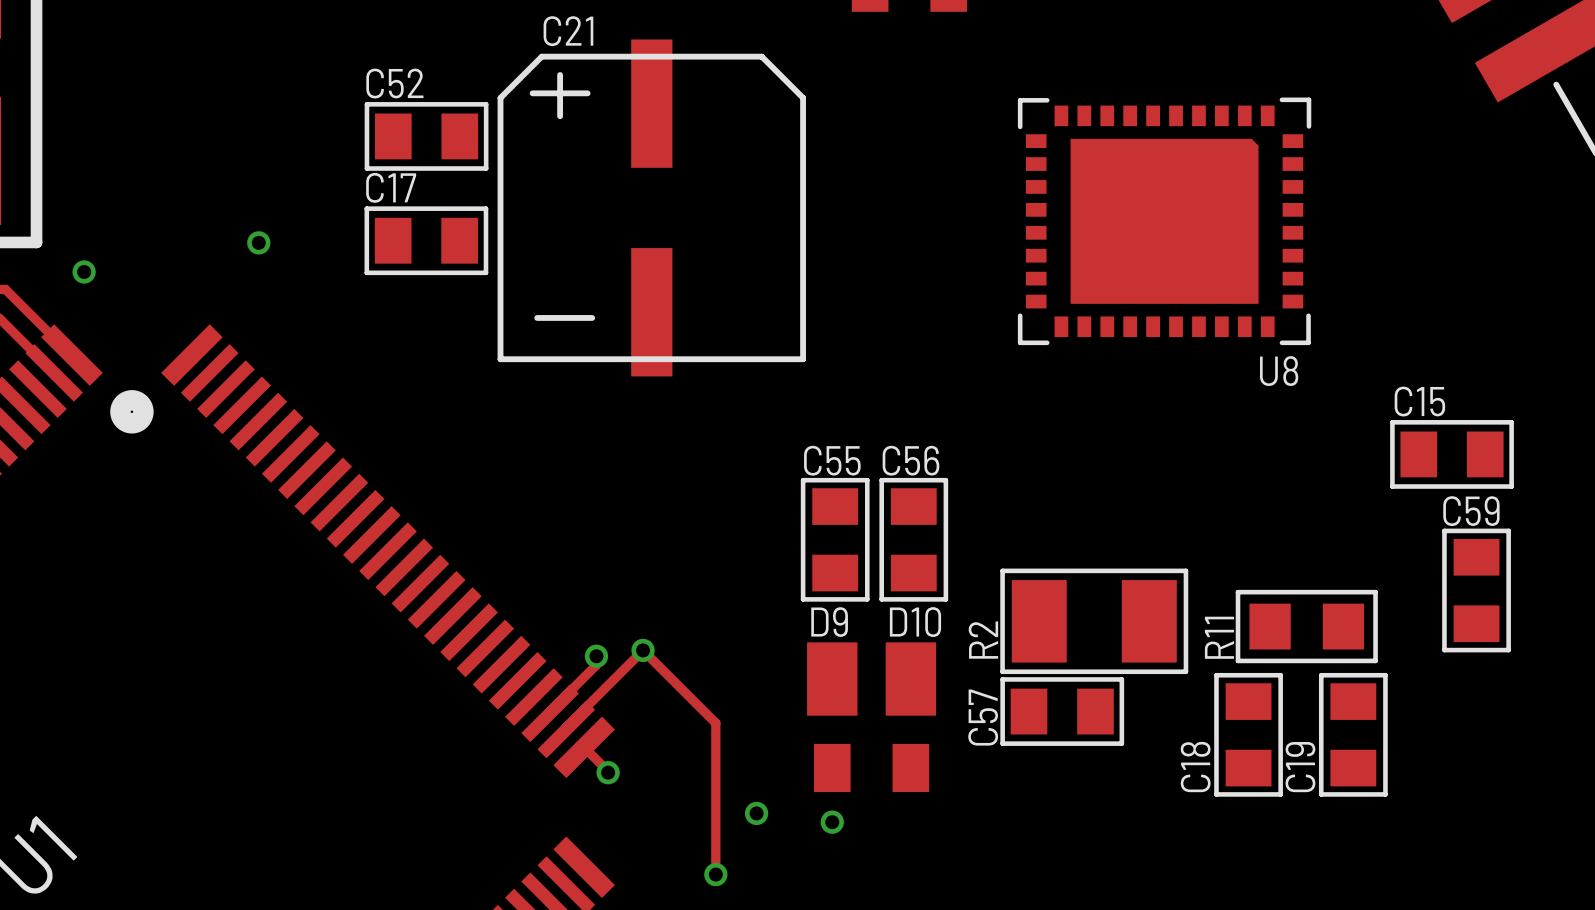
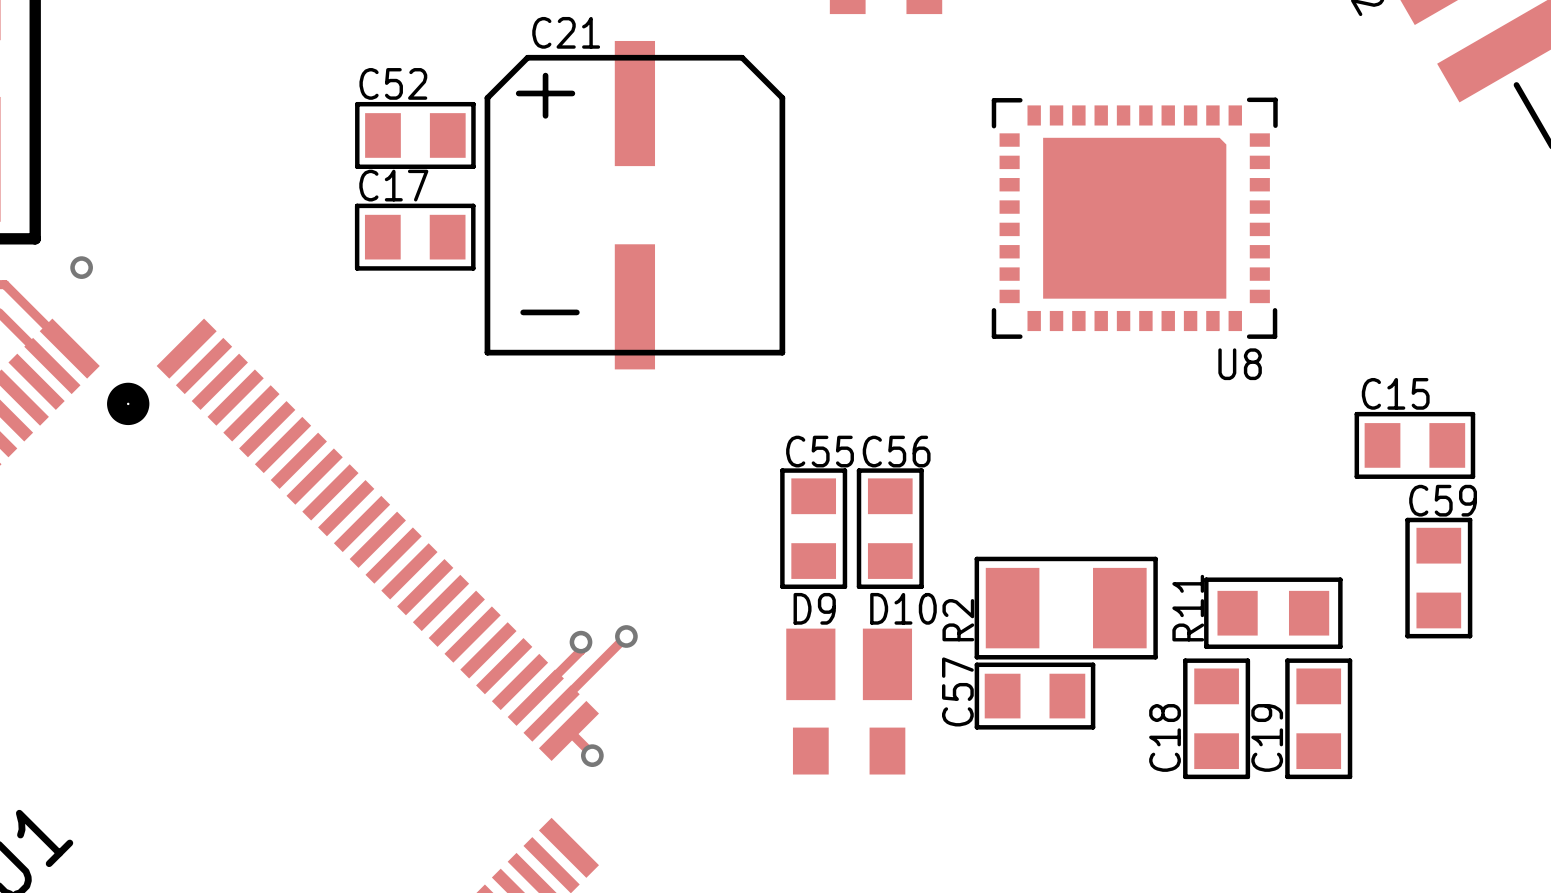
via: (258, 242) -> none
track: (643, 650) (715, 723) (715, 874) -> none
via: (756, 813) -> none
via: (832, 822) -> none
via: (715, 874) -> none

